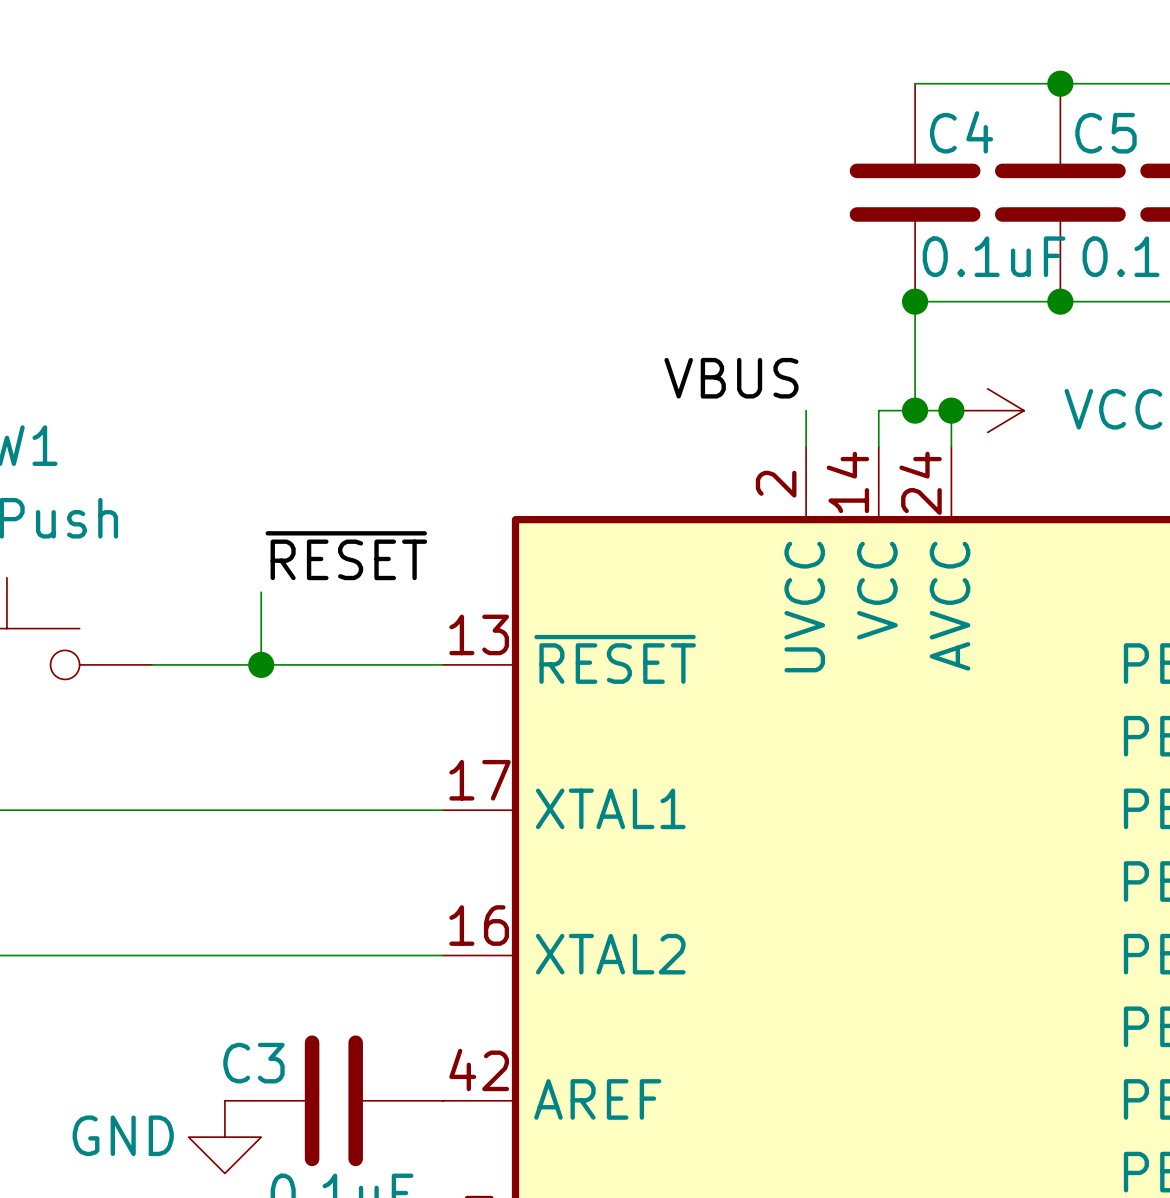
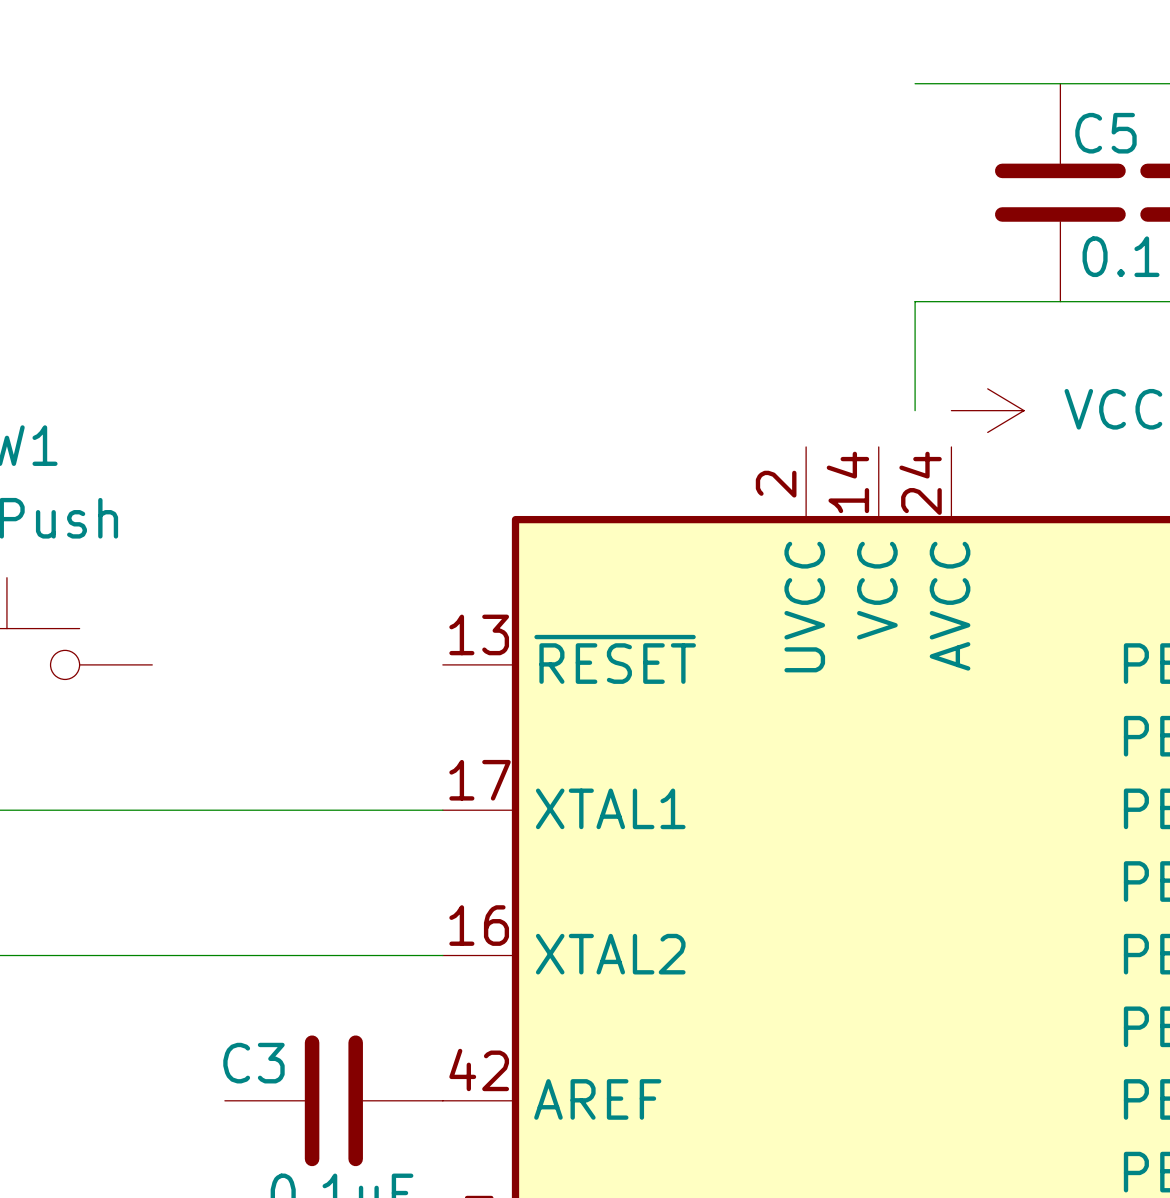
junction: (1060, 83) -> none
C4: 0.1uF (915, 192) -> none
junction: (915, 301) -> none
junction: (1060, 301) -> none
label: VBUS (731, 378) -> none
wire: (806, 410) (806, 446) -> none
junction: (915, 410) -> none
junction: (951, 410) -> none
wire: (878, 446) (878, 410) (951, 410) (951, 446) -> none
label: ~{RESET} (346, 555) -> none
wire: (261, 592) (261, 664) -> none
wire: (152, 664) (442, 664) -> none
junction: (261, 664) -> none
power symbol: GND (224, 1137) -> none

